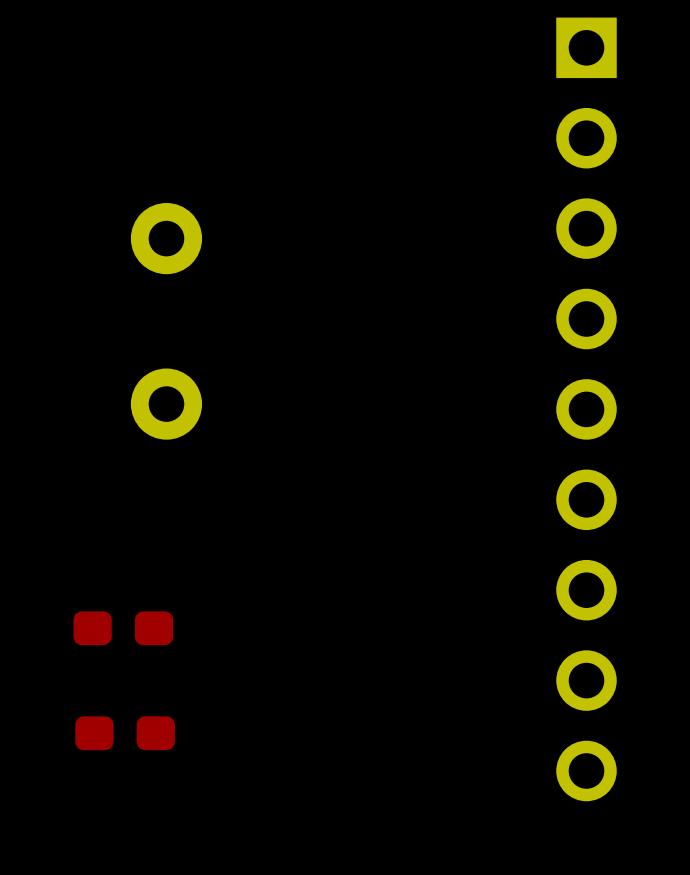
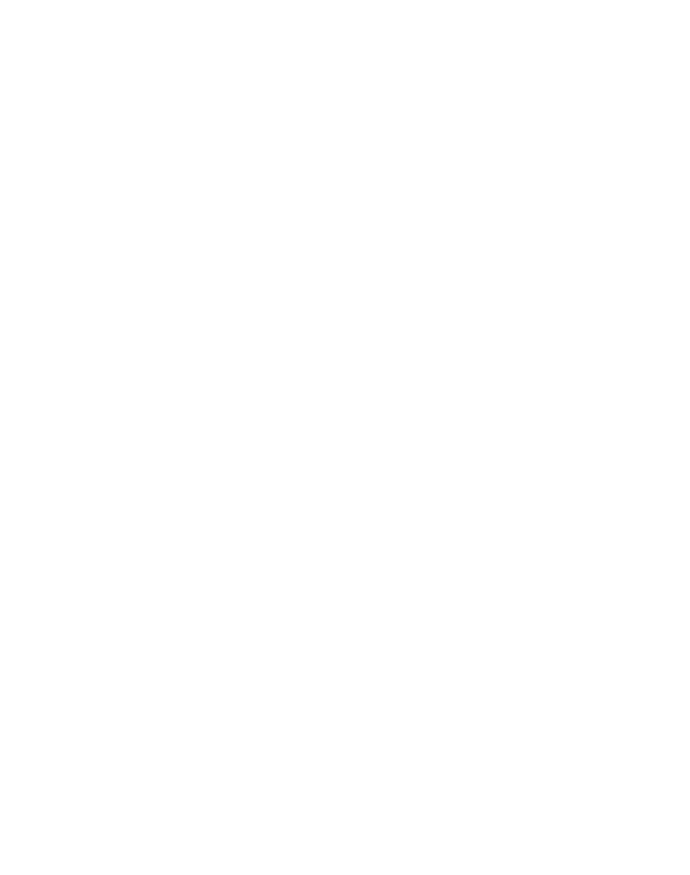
part: (166, 238) -> none
part: (166, 404) -> none
part: (586, 409) -> none
part: (123, 628) -> none
part: (125, 733) -> none

